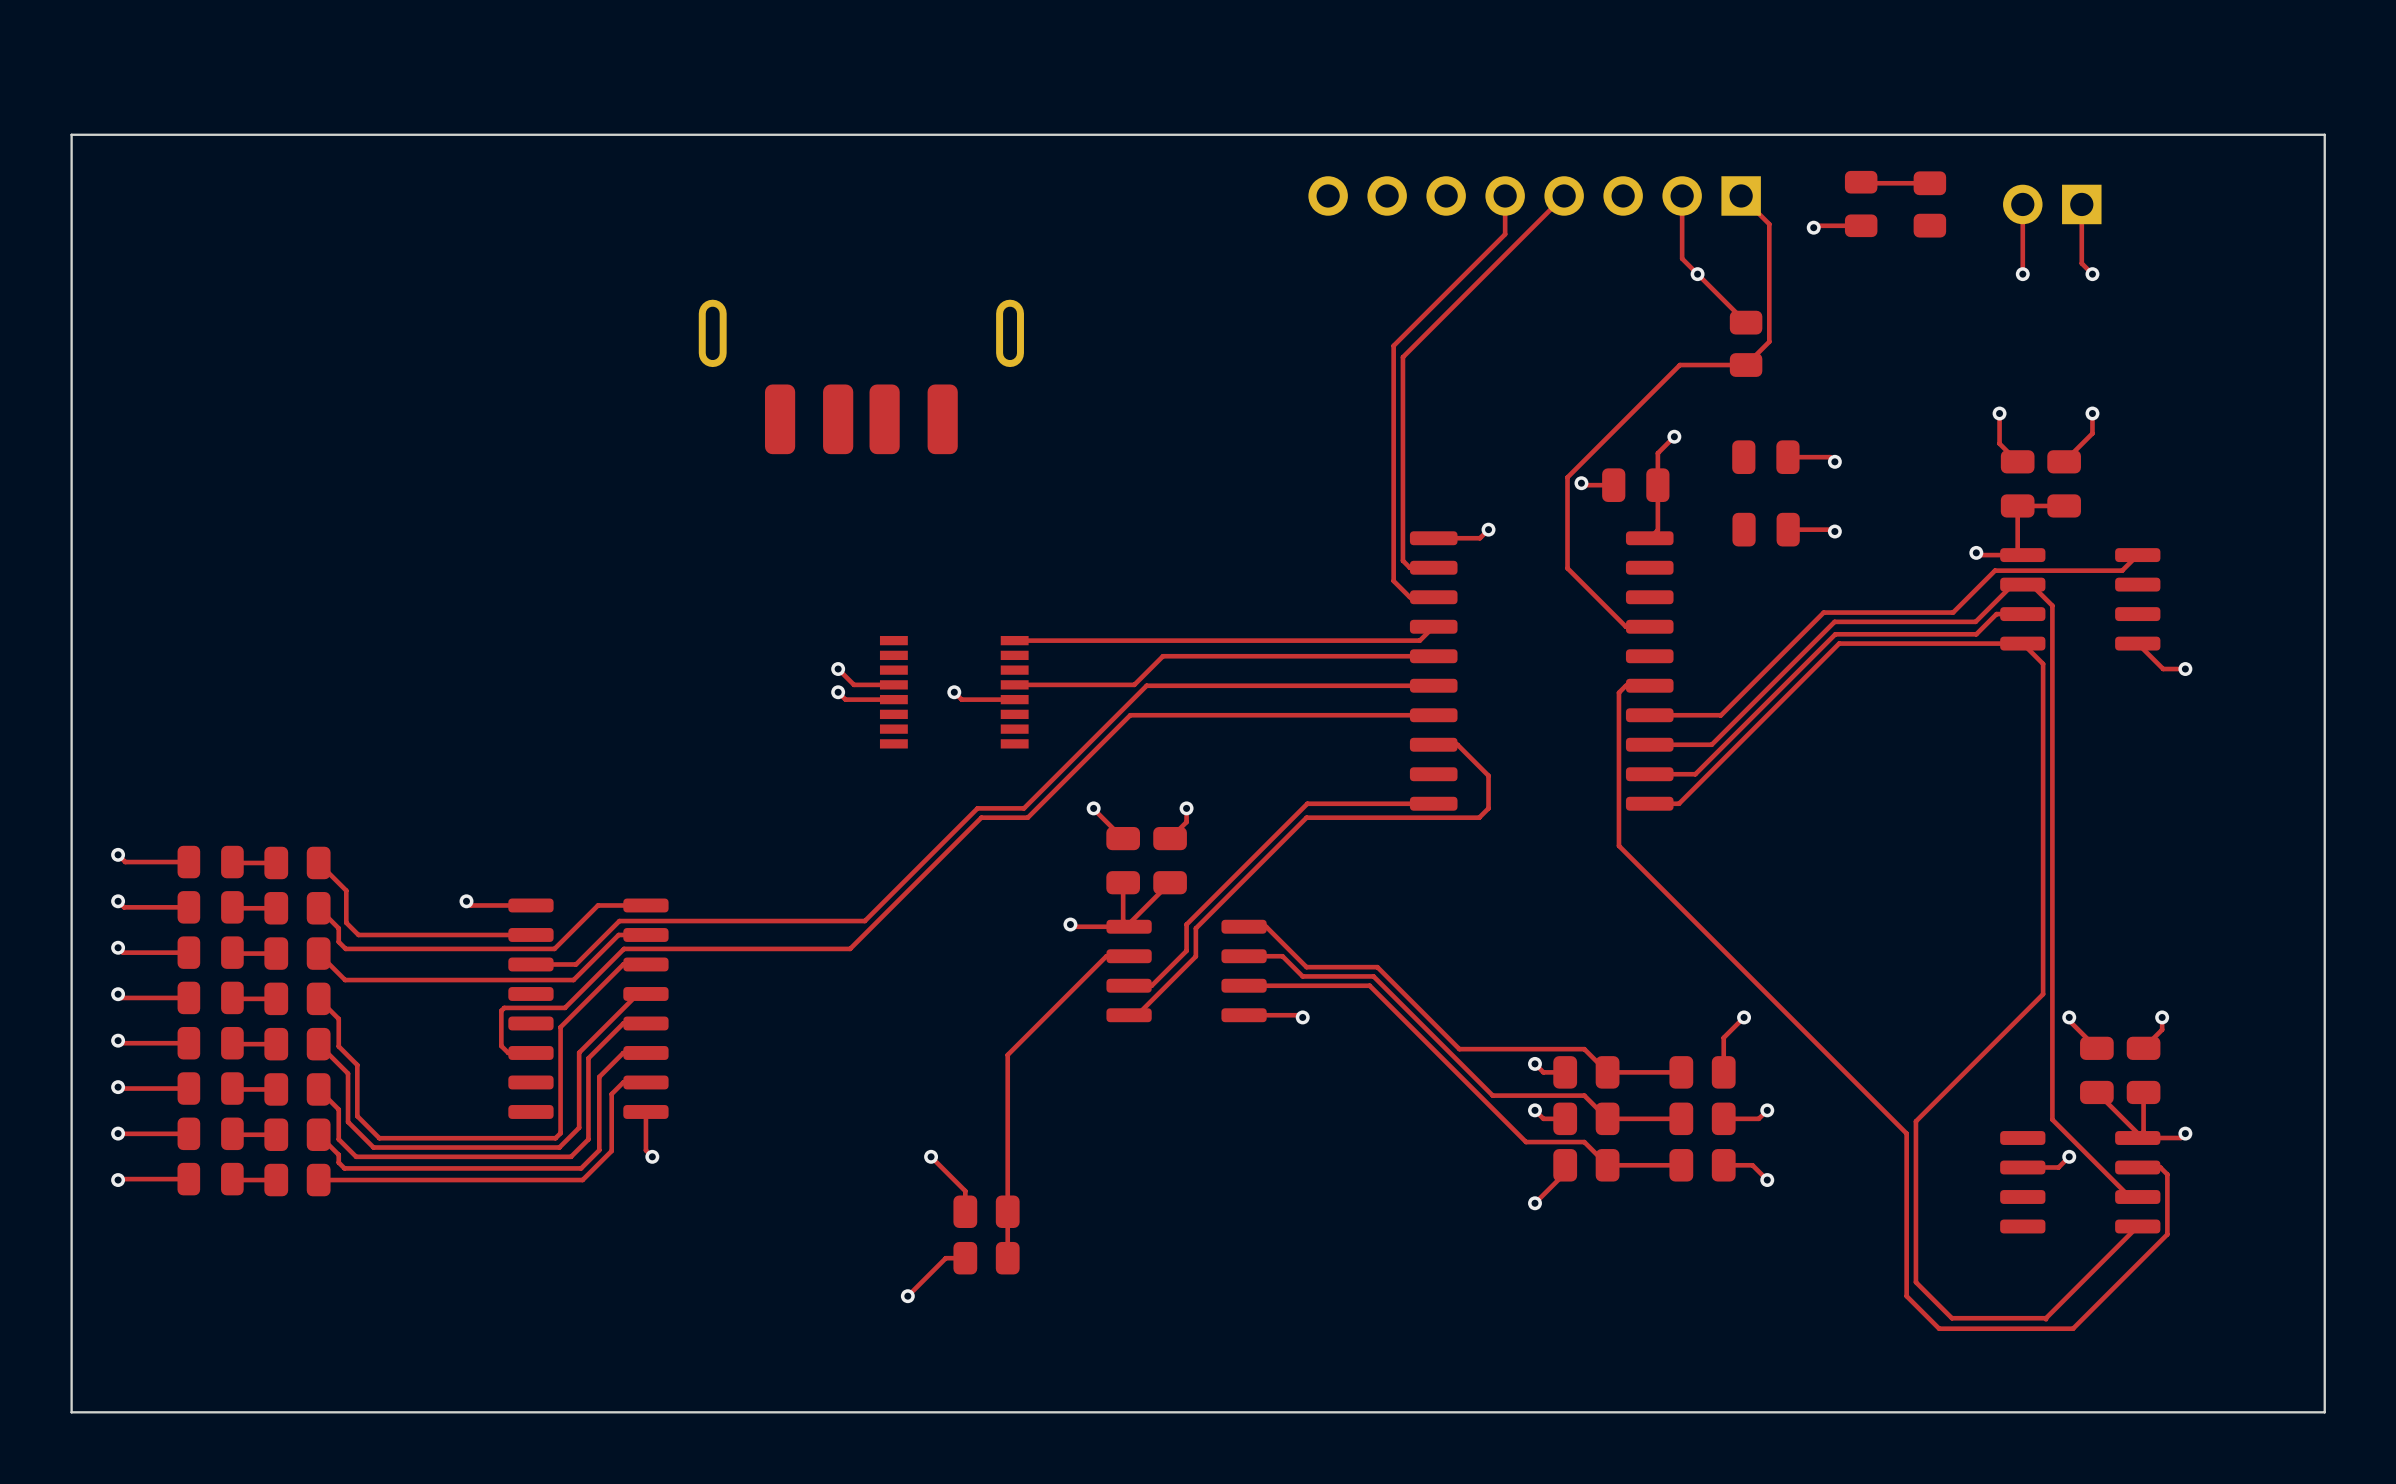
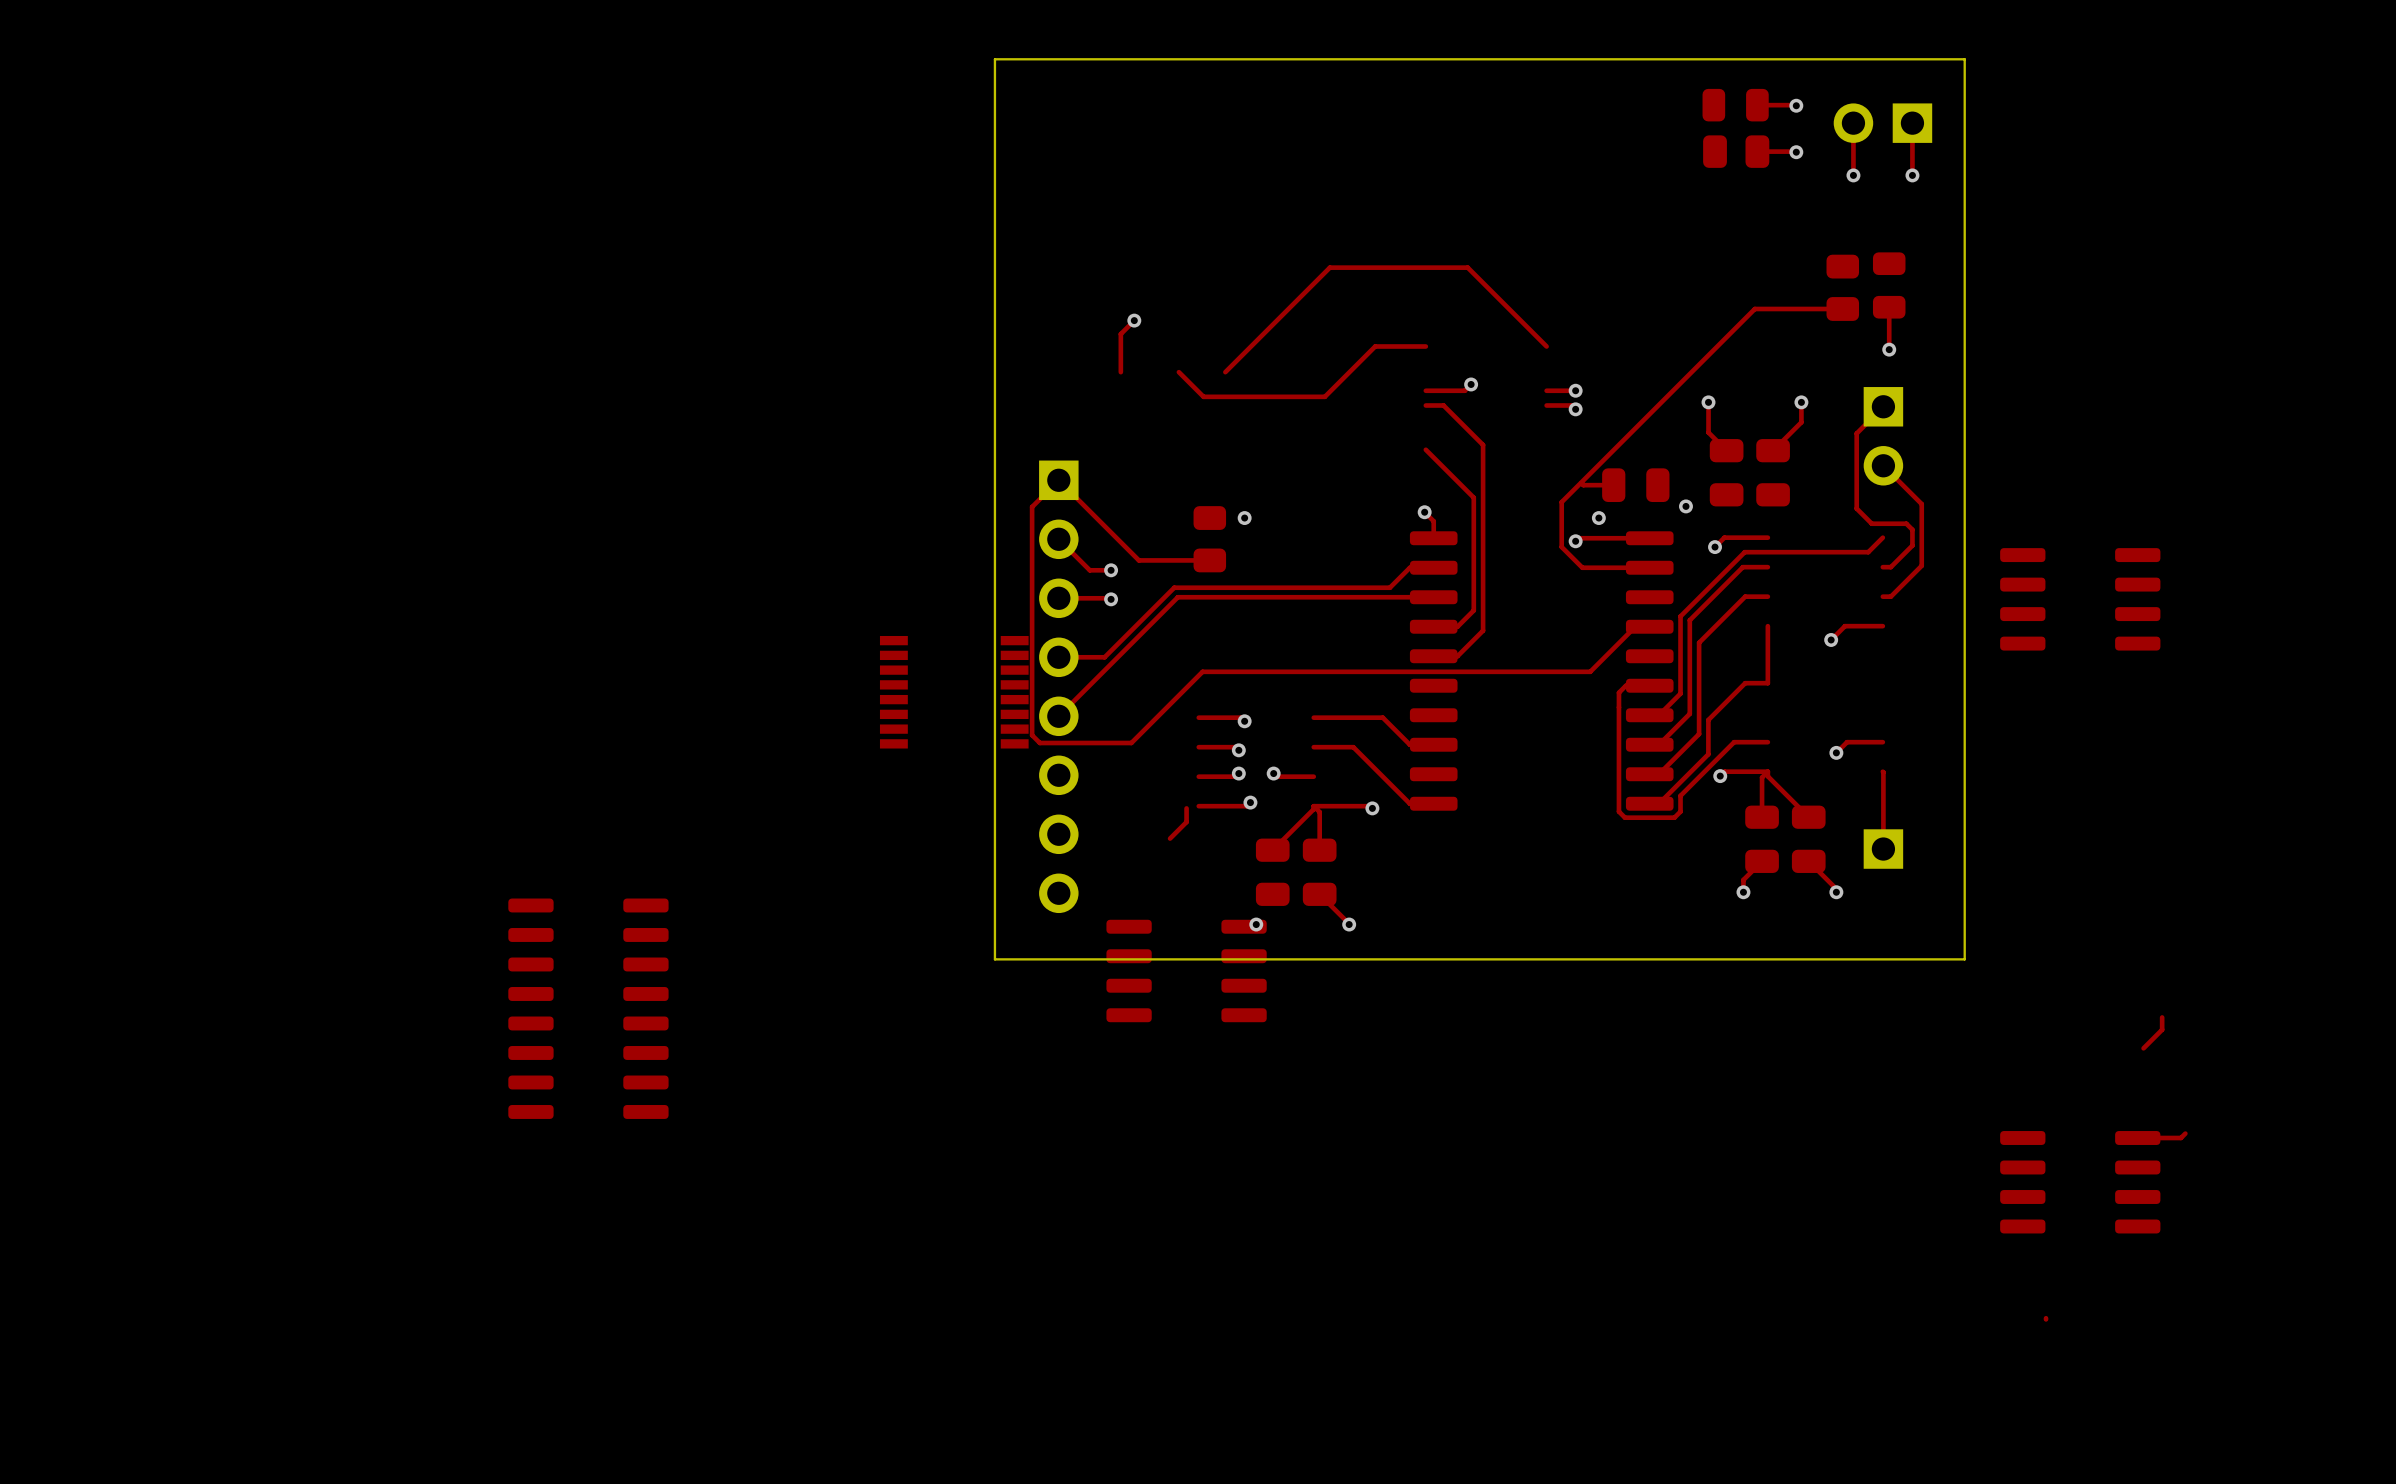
board edge: none -> (1964, 59) (994, 59) (994, 959) (1964, 959) (1964, 59)
part: none -> (1735, 105)
top track: none -> (1757, 105) (1796, 105)
via: none -> (1796, 105)
top track: none -> (1853, 123) (1853, 175)
part: none -> (1882, 123)
top track: none -> (1912, 123) (1912, 175)
board edge: (2324, 134) (71, 134) (71, 1412) (2324, 1412) (2324, 134) -> none
part: none -> (1736, 151)
top track: none -> (1757, 151) (1796, 152)
via: none -> (1796, 152)
via: none -> (1853, 175)
via: none -> (1912, 175)
top track: (1861, 182) (1929, 183) -> none
top track: (1505, 195) (1505, 234) (1393, 345) (1393, 580) (1409, 597) -> (1058, 716) (1177, 597) (1409, 597)
part: (1534, 195) -> none
top track: (1564, 195) (1402, 357) (1402, 560) (1409, 567) -> (1058, 657) (1104, 657) (1174, 587) (1389, 587) (1409, 567)
top track: (1682, 195) (1682, 258) (1746, 322) -> none
top track: (1741, 195) (1769, 224) (1769, 341) (1746, 365) (1679, 365) (1567, 477) (1567, 568) (1625, 626) (1635, 626) -> (1209, 560) (1138, 560) (1058, 480) (1032, 507) (1032, 735) (1039, 743) (1131, 743) (1202, 671) (1590, 671) (1635, 626)
part: (1861, 203) -> none
part: (1929, 204) -> none
top track: (2022, 204) (2022, 274) -> none
part: (2052, 204) -> none
top track: (2081, 204) (2081, 263) (2092, 274) -> none
top track: (1861, 225) (1815, 225) (1813, 227) -> none
via: (1813, 227) -> none
via: (1697, 274) -> none
via: (2022, 274) -> none
via: (2092, 274) -> none
part: none -> (1889, 285)
part: none -> (1842, 287)
top track: none -> (1889, 307) (1889, 349)
top track: none -> (1842, 308) (1754, 308) (1561, 502) (1561, 547) (1582, 567) (1649, 567)
top track: none -> (1134, 320) (1120, 334) (1120, 372)
via: none -> (1134, 320)
part: (1746, 343) -> none
top track: none -> (1425, 346) (1375, 346) (1324, 396) (1203, 396) (1178, 372)
top track: none -> (1546, 346) (1467, 267) (1329, 267) (1225, 372)
via: none -> (1889, 349)
part: (861, 376) -> none
top track: none -> (1471, 384) (1464, 390) (1425, 390)
via: none -> (1471, 384)
top track: none -> (1575, 390) (1546, 390)
via: none -> (1575, 390)
via: none -> (1708, 402)
via: none -> (1801, 402)
top track: none -> (1546, 405) (1571, 405) (1575, 409)
top track: none -> (1883, 406) (1856, 433) (1856, 508) (1871, 523) (1906, 523) (1912, 529) (1912, 545) (1890, 567) (1882, 567)
via: none -> (1575, 409)
top track: (1999, 413) (1999, 443) (2017, 461) -> (1708, 402) (1708, 432) (1726, 450)
via: (1999, 413) -> none
top track: (2092, 413) (2092, 433) (2064, 461) -> (1801, 402) (1801, 422) (1773, 450)
via: (2092, 413) -> none
top track: (1674, 436) (1657, 453) (1657, 530) (1649, 538) -> (1575, 541) (1578, 538) (1649, 538)
via: (1674, 436) -> none
part: none -> (1883, 436)
part rotation: 0° (1765, 457) -> 90° clockwise (1773, 472)
top track: (1787, 457) (1830, 457) (1834, 461) -> none
via: (1834, 461) -> none
top track: none -> (1883, 465) (1921, 504) (1921, 565) (1890, 596) (1882, 596)
via: (1581, 483) -> none
part: (2017, 483) -> none
part: (2064, 483) -> none
top track: (2064, 505) (2017, 505) (2017, 549) (2022, 555) (1978, 555) (1976, 552) -> none
via: none -> (1685, 506)
via: none -> (1424, 512)
via: none -> (1244, 518)
via: none -> (1598, 518)
top track: (1488, 529) (1479, 538) (1433, 538) -> (1424, 512) (1433, 521) (1433, 538)
via: (1488, 529) -> none
part rotation: 0° (1766, 529) -> 90° clockwise (1726, 472)
part position: (1766, 529) -> (1726, 472)
top track: (1788, 529) (1833, 529) (1834, 531) -> none
via: (1834, 531) -> none
top track: none -> (1767, 537) (1724, 537) (1715, 547)
top track: none -> (1058, 539) (1089, 570) (1111, 570)
part: none -> (1209, 539)
via: none -> (1575, 541)
via: none -> (1715, 547)
via: (1976, 552) -> none
top track: (2137, 555) (2122, 570) (1995, 570) (1953, 612) (1823, 612) (1720, 715) -> none
via: none -> (1111, 570)
top track: none -> (1058, 598) (1111, 599)
via: none -> (1111, 599)
top track: (2022, 614) (1996, 614) (1976, 634) (1835, 634) (1695, 774) (1658, 774) -> (1767, 596) (1745, 596) (1699, 642) (1699, 734) (1658, 774)
top track: (1433, 626) (1419, 640) (1014, 640) -> (1433, 626) (1457, 626) (1473, 610) (1473, 497) (1425, 449)
top track: none -> (1882, 626) (1844, 626) (1831, 639)
via: none -> (1831, 639)
top track: (2137, 643) (2163, 669) (2185, 669) -> none
top track: (1433, 656) (1162, 656) (1134, 684) (1014, 684) -> (1433, 656) (1457, 656) (1483, 630) (1483, 444) (1443, 405) (1425, 405)
top track: (838, 669) (854, 684) (893, 684) -> none
via: (838, 669) -> none
via: (2185, 669) -> none
top track: (1433, 685) (1146, 685) (1023, 808) (977, 808) (864, 921) (619, 921) (576, 964) (530, 964) -> none
part: none -> (1058, 686)
top track: (838, 692) (845, 699) (893, 699) -> none
via: (838, 692) -> none
top track: (954, 692) (961, 699) (1014, 699) -> none
via: (954, 692) -> none
top track: (1433, 715) (1130, 715) (1027, 817) (981, 817) (850, 948) (623, 948) (564, 1007) (504, 1007) (501, 1010) (501, 1046) (508, 1052) (530, 1052) -> none
top track: (1720, 715) (1658, 715) -> (1882, 537) (1868, 552) (1744, 552) (1680, 616) (1680, 693) (1658, 715)
top track: none -> (1198, 717) (1241, 717) (1244, 721)
via: none -> (1244, 721)
top track: none -> (1882, 742) (1847, 742) (1836, 752)
top track: (1433, 744) (1457, 744) (1488, 775) (1488, 808) (1479, 817) (1306, 817) (1195, 928) (1195, 956) (1137, 1015) (1129, 1015) -> (1433, 744) (1409, 744) (1382, 717) (1313, 717)
top track: (1658, 744) (1711, 744) (1834, 621) (1975, 621) (2012, 584) (2031, 584) (2052, 605) (2052, 1119) (2129, 1196) (2137, 1196) -> (1658, 744) (1689, 713) (1689, 620) (1742, 567) (1767, 567)
top track: none -> (1198, 747) (1235, 747) (1238, 750)
via: none -> (1238, 750)
via: none -> (1836, 752)
top track: none -> (1767, 771) (1724, 771) (1720, 776)
top track: none -> (1767, 771) (1767, 776) (1808, 817)
top track: none -> (1767, 771) (1762, 777) (1762, 817)
top track: none -> (1882, 771) (1883, 849)
top track: none -> (1238, 773) (1235, 776) (1198, 776)
via: none -> (1238, 773)
top track: none -> (1273, 773) (1276, 776) (1313, 776)
via: none -> (1273, 773)
via: none -> (1720, 776)
top track: none -> (1250, 802) (1246, 806) (1198, 806)
via: none -> (1250, 802)
top track: (1409, 803) (1307, 803) (1186, 924) (1186, 950) (1151, 985) (1129, 985) -> (1409, 803) (1353, 747) (1313, 747)
top track: (1658, 803) (1679, 803) (1839, 643) (2022, 643) (2043, 663) (2043, 994) (1915, 1121) (1915, 1282) (1951, 1318) (2046, 1318) (2137, 1226) -> (1658, 803) (1708, 754) (1708, 720) (1745, 683) (1767, 683) (1767, 626)
top track: none -> (1313, 806) (1319, 812) (1319, 850)
top track: none -> (1313, 806) (1313, 809) (1272, 850)
top track: (1093, 808) (1123, 838) -> none
via: (1093, 808) -> none
via: (1186, 808) -> none
via: none -> (1372, 808)
top track: (1618, 811) (1618, 845) (1906, 1133) (1906, 1296) (1939, 1328) (2073, 1328) (2167, 1234) (2167, 1174) (2160, 1167) (2137, 1167) -> (1618, 811) (1624, 817) (1674, 817) (1680, 811) (1680, 795) (1734, 742) (1767, 742)
part: none -> (1762, 839)
part: none -> (1808, 839)
part: none -> (1883, 849)
top track: (118, 854) (125, 862) (188, 862) -> none
via: (118, 854) -> none
part: (1123, 860) -> none
part: (1170, 860) -> none
top track: none -> (1762, 861) (1743, 879) (1743, 892)
top track: none -> (1808, 861) (1836, 888) (1836, 892)
part: (210, 862) -> none
top track: (232, 862) (276, 862) -> none
part: (297, 862) -> none
top track: (318, 862) (346, 890) (346, 922) (358, 934) (530, 934) -> none
part: none -> (1272, 872)
part: none -> (1319, 872)
top track: (1123, 882) (1123, 920) (1129, 926) -> none
top track: (1170, 882) (1129, 923) (1129, 926) -> none
via: none -> (1743, 892)
via: none -> (1836, 892)
top track: none -> (1319, 894) (1349, 924)
top track: (118, 901) (124, 907) (188, 907) -> none
via: (118, 901) -> none
top track: (466, 901) (470, 905) (530, 905) -> none
via: (466, 901) -> none
top track: (645, 905) (597, 905) (554, 948) (345, 948) (338, 941) (338, 928) (318, 908) -> none
part: (210, 907) -> none
top track: (232, 907) (276, 908) -> none
part: (297, 908) -> none
top track: (1070, 924) (1072, 926) (1129, 926) -> none
via: (1070, 924) -> none
via: none -> (1256, 924)
via: none -> (1349, 924)
top track: (1244, 926) (1266, 926) (1306, 967) (1377, 967) (1459, 1049) (1584, 1049) (1607, 1072) (1681, 1072) -> none
top track: (645, 934) (618, 934) (573, 980) (345, 980) (318, 953) -> none
top track: (118, 947) (122, 952) (188, 952) -> none
via: (118, 947) -> none
part: (210, 952) -> none
top track: (232, 952) (276, 953) -> none
part: (297, 953) -> none
top track: (1129, 956) (1106, 956) (1007, 1054) (1007, 1258) -> none
top track: (1244, 956) (1282, 956) (1302, 976) (1373, 976) (1492, 1095) (1584, 1095) (1607, 1118) (1681, 1118) -> none
top track: (645, 964) (623, 964) (560, 1027) (560, 1133) (555, 1138) (379, 1138) (357, 1116) (357, 1065) (338, 1046) (338, 1018) (318, 998) -> none
top track: (1244, 985) (1369, 985) (1526, 1142) (1584, 1142) (1607, 1165) (1681, 1165) -> none
top track: (645, 993) (637, 993) (579, 1052) (579, 1127) (559, 1147) (373, 1147) (348, 1121) (348, 1073) (318, 1044) -> none
top track: (118, 994) (121, 997) (188, 997) -> none
via: (118, 994) -> none
part: (210, 997) -> none
top track: (232, 997) (276, 998) -> none
part: (297, 998) -> none
top track: (1244, 1015) (1300, 1015) (1302, 1017) -> (1313, 806) (1370, 806) (1372, 808)
via: (1302, 1017) -> none
top track: (1744, 1017) (1723, 1037) (1723, 1072) -> none
via: (1744, 1017) -> none
top track: (2069, 1017) (2069, 1020) (2096, 1048) -> none
via: (2069, 1017) -> none
via: (2162, 1017) -> none
top track: (645, 1023) (623, 1023) (588, 1058) (588, 1139) (571, 1156) (356, 1156) (338, 1139) (338, 1109) (318, 1089) -> none
top track: (118, 1040) (120, 1043) (188, 1043) -> none
via: (118, 1040) -> none
part: (210, 1043) -> none
top track: (232, 1043) (276, 1044) -> none
part: (297, 1044) -> none
top track: (645, 1052) (623, 1052) (599, 1076) (599, 1150) (581, 1168) (344, 1168) (338, 1162) (338, 1154) (318, 1134) -> none
top track: (1534, 1063) (1543, 1072) (1565, 1072) -> none
via: (1534, 1063) -> none
part: (2096, 1070) -> none
part: (2143, 1070) -> none
part: (1586, 1072) -> none
part: (1702, 1072) -> none
top track: (645, 1082) (623, 1082) (611, 1094) (611, 1151) (582, 1180) (318, 1180) -> none
top track: (118, 1087) (188, 1088) -> none
via: (118, 1087) -> none
part: (210, 1088) -> none
top track: (232, 1088) (276, 1089) -> none
part: (297, 1089) -> none
top track: (2143, 1092) (2143, 1132) (2137, 1137) (2137, 1133) (2096, 1092) -> none
top track: (1534, 1110) (1543, 1118) (1565, 1118) -> none
via: (1534, 1110) -> none
top track: (1767, 1110) (1758, 1118) (1723, 1118) -> none
via: (1767, 1110) -> none
top track: (645, 1111) (645, 1150) (652, 1156) -> none
part: (1586, 1118) -> none
part: (1702, 1118) -> none
via: (118, 1133) -> none
top track: (188, 1133) (118, 1133) -> none
part: (210, 1133) -> none
top track: (232, 1133) (276, 1134) -> none
via: (2185, 1133) -> none
part: (297, 1134) -> none
via: (652, 1156) -> none
top track: (931, 1156) (965, 1191) (965, 1211) -> none
via: (931, 1156) -> none
top track: (2069, 1156) (2058, 1167) (2022, 1167) -> none
via: (2069, 1156) -> none
top track: (1565, 1165) (1565, 1173) (1534, 1203) -> none
part: (1586, 1165) -> none
part: (1702, 1165) -> none
top track: (1723, 1165) (1752, 1165) (1767, 1180) -> none
top track: (188, 1179) (118, 1180) -> none
part: (210, 1179) -> none
top track: (232, 1179) (276, 1180) -> none
via: (118, 1180) -> none
part: (297, 1180) -> none
via: (1767, 1180) -> none
via: (1534, 1203) -> none
part: (986, 1211) -> none
top track: (965, 1258) (945, 1258) (907, 1296) -> none
part: (986, 1258) -> none
via: (907, 1296) -> none

